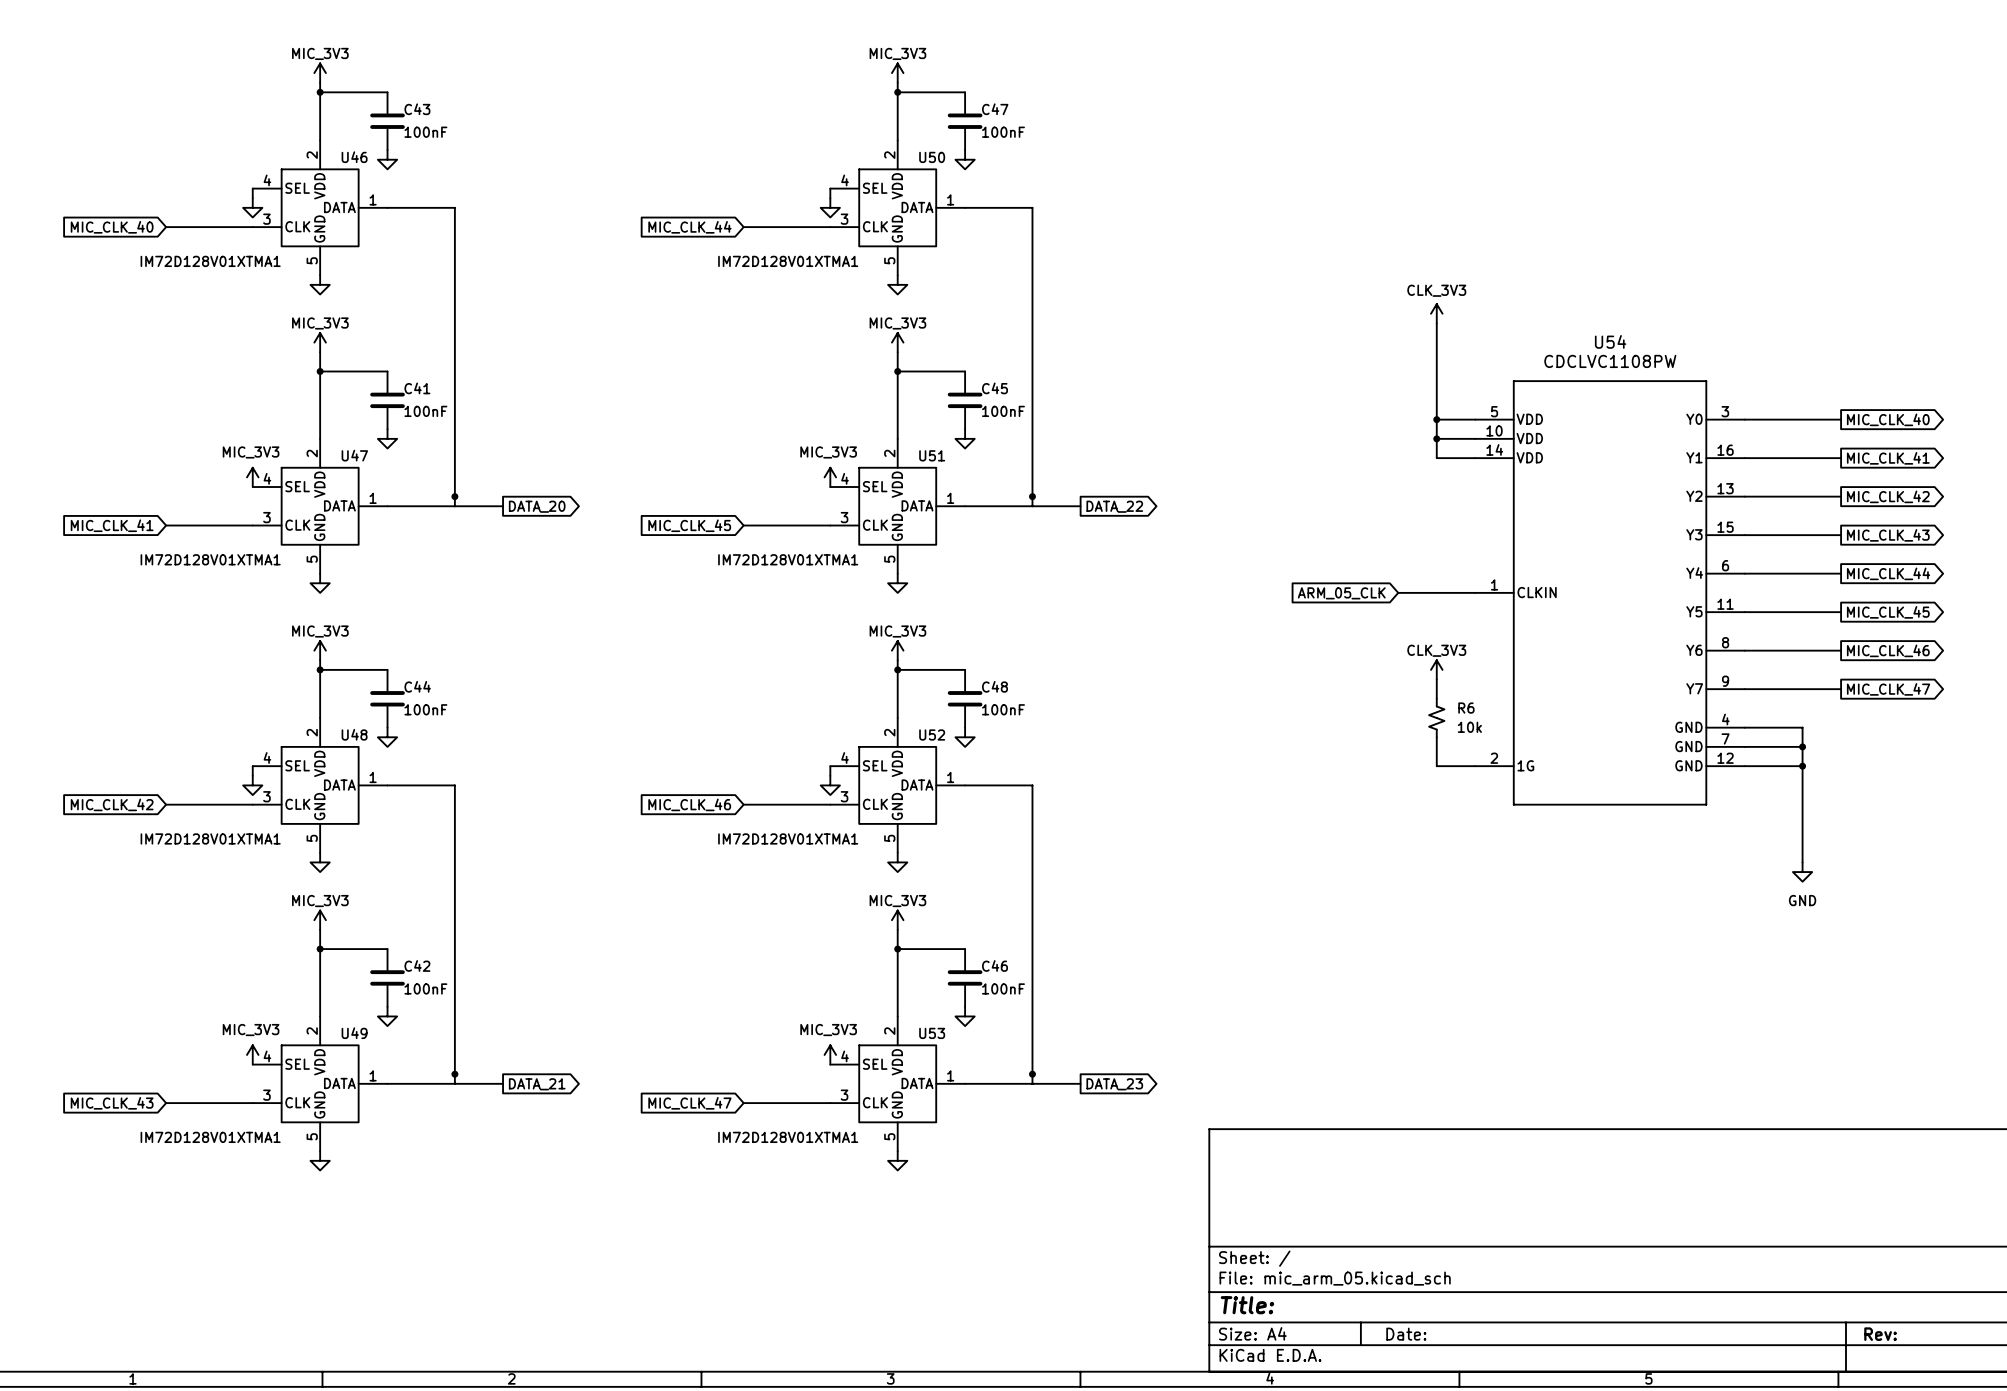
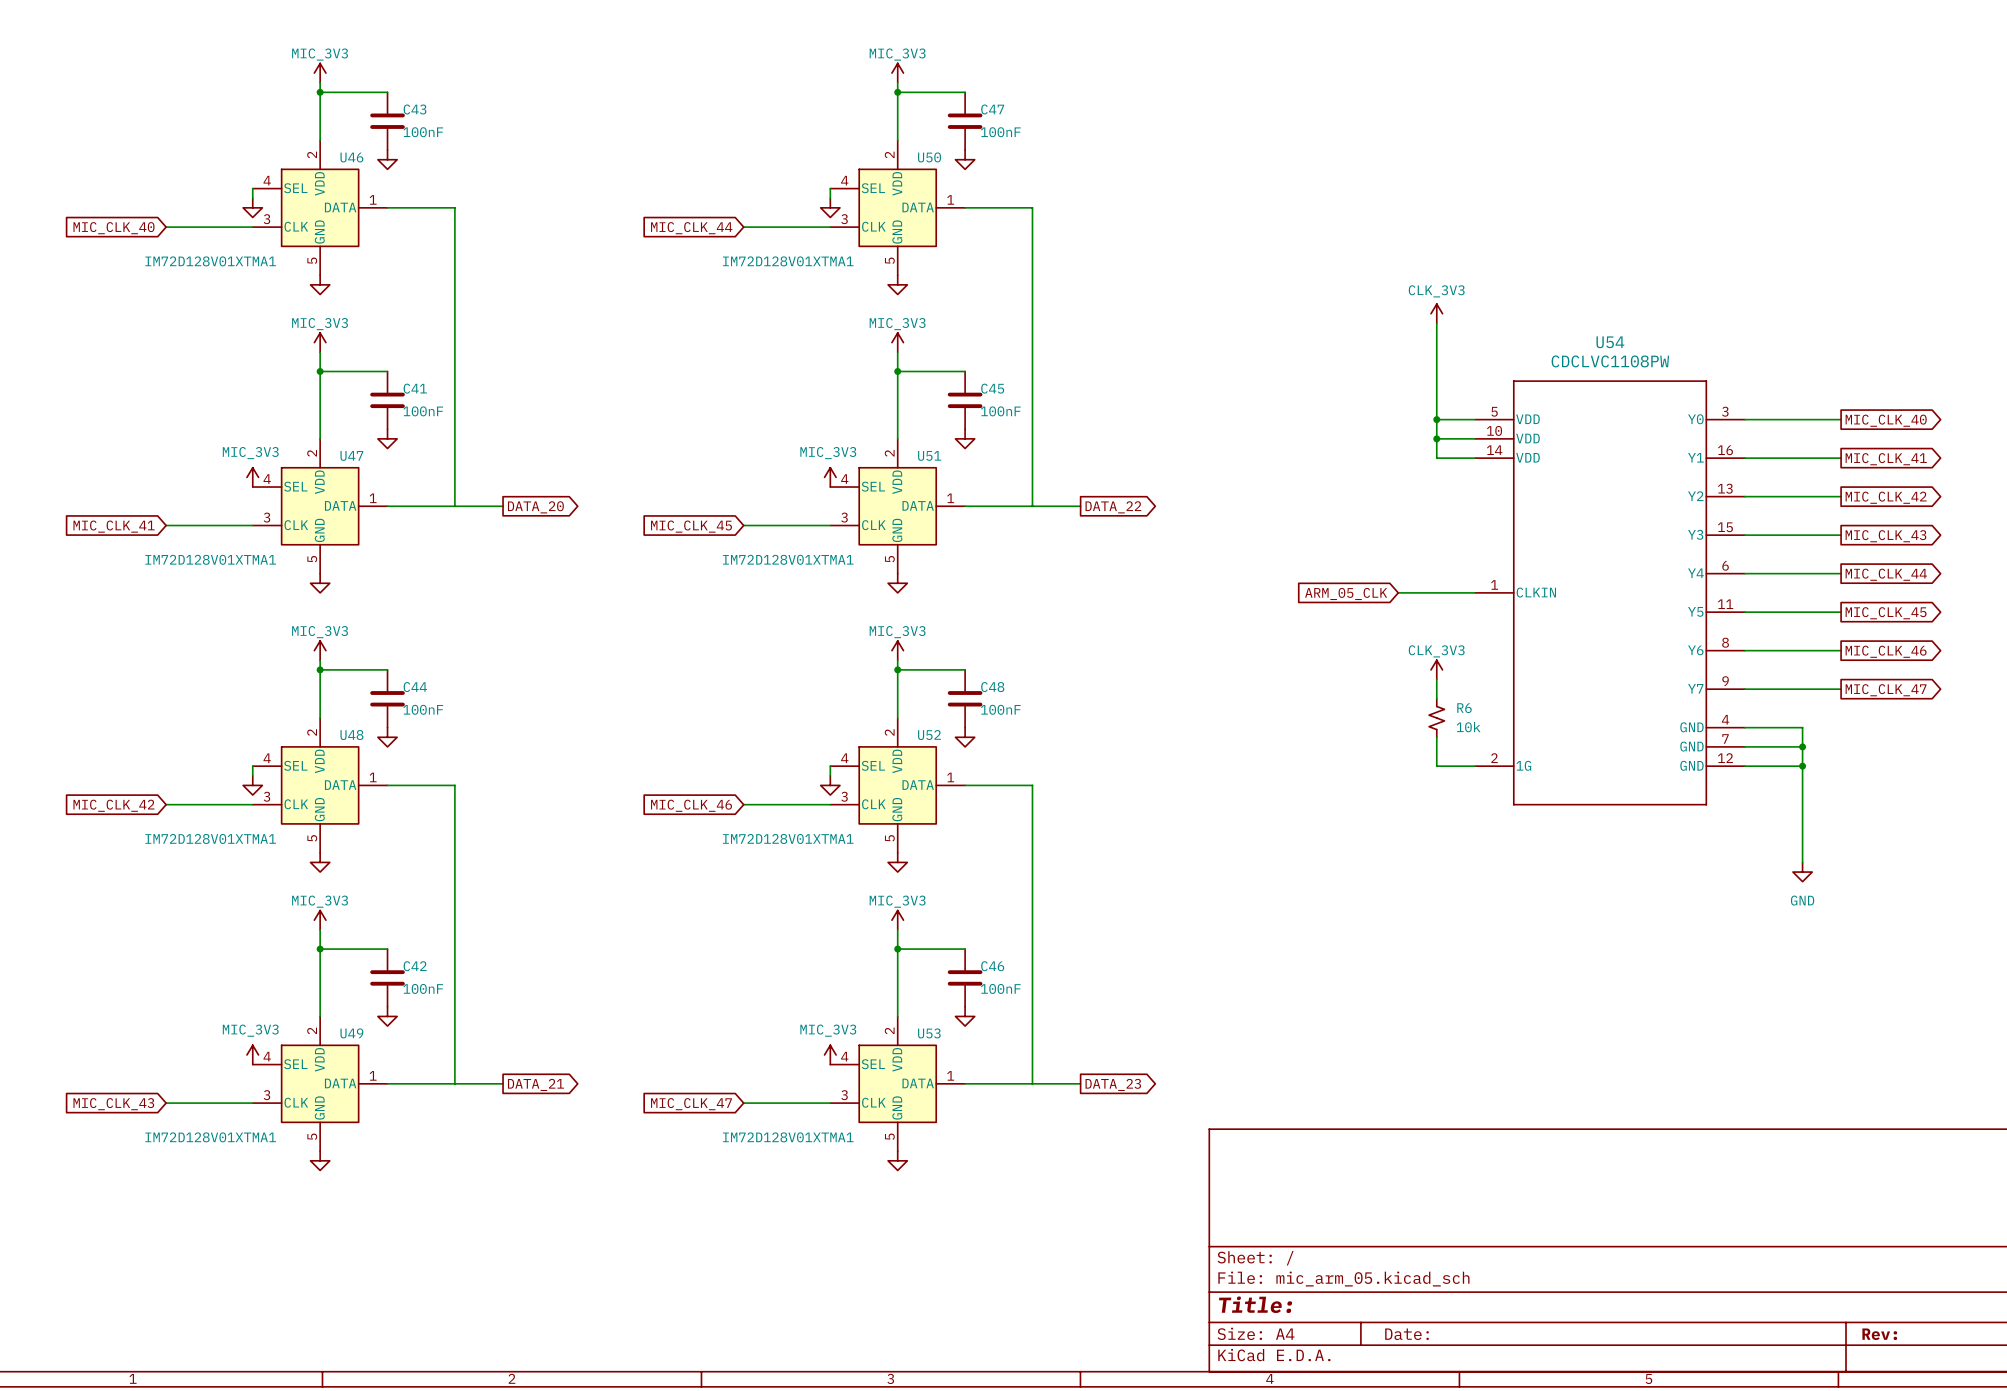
junction: (454, 496) -> none
junction: (1032, 496) -> none
junction: (454, 1074) -> none
junction: (1032, 1074) -> none

